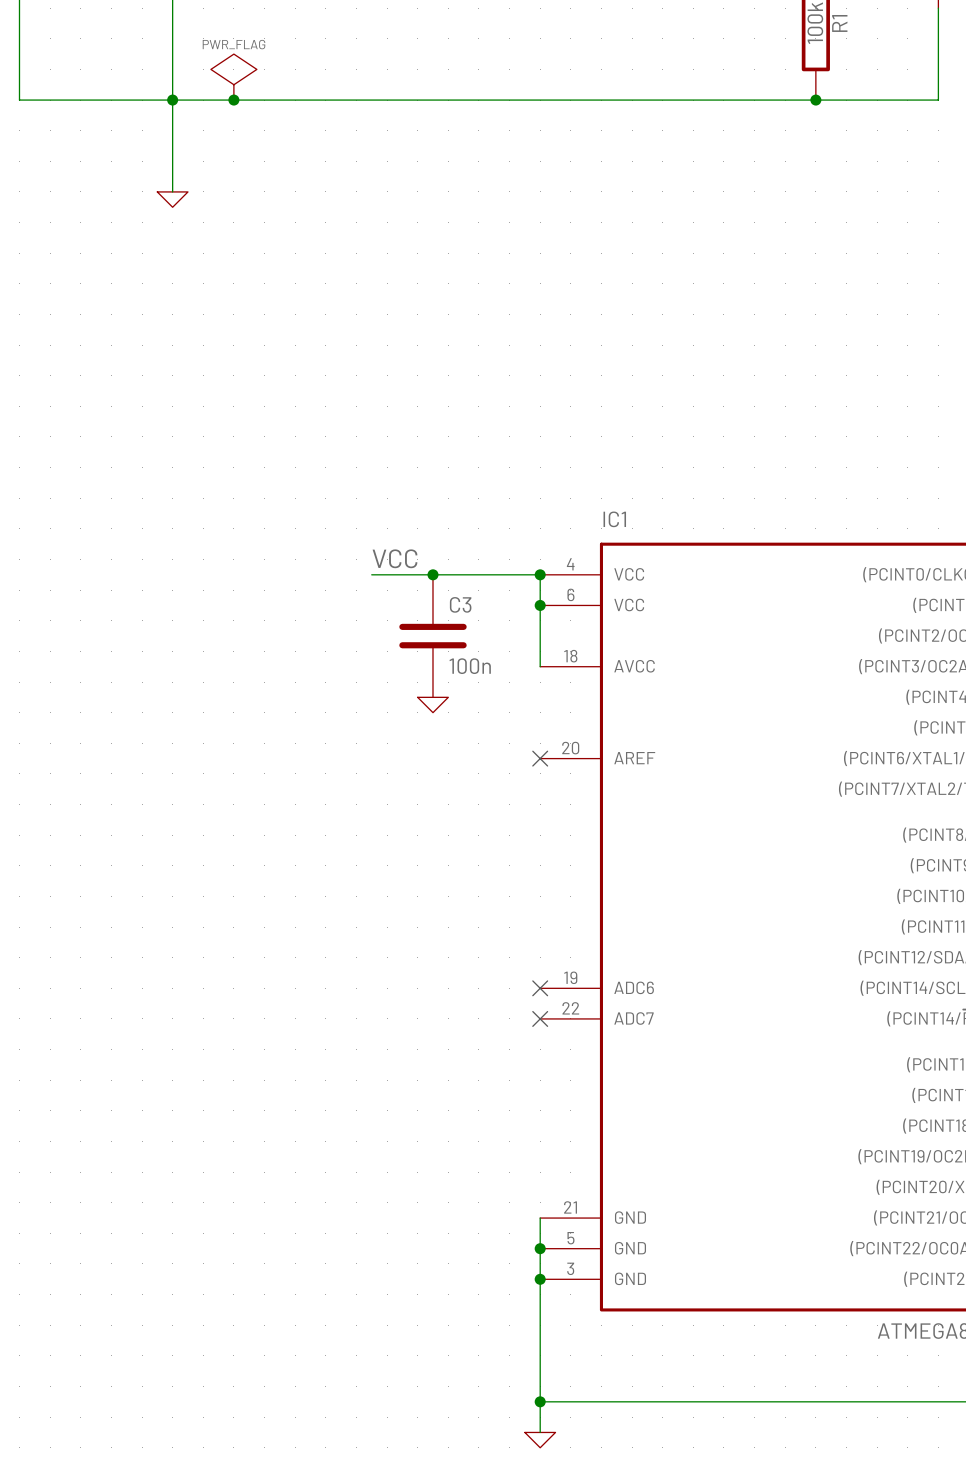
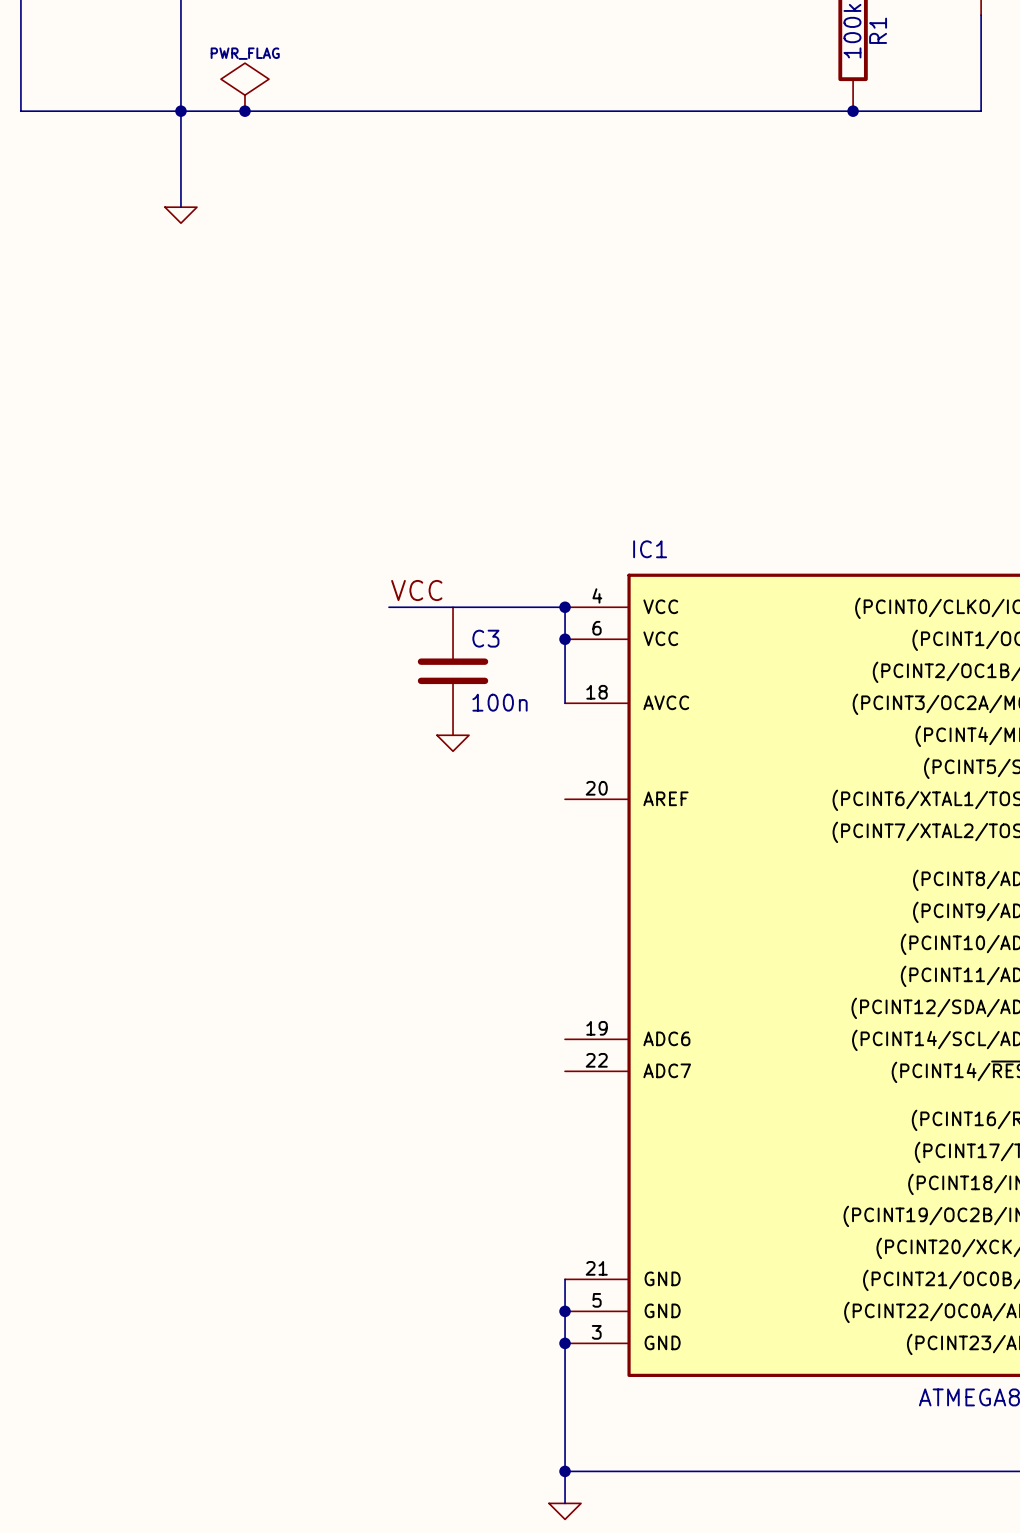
junction: (432, 574) -> none
no-connect mark: (540, 758) -> none
no-connect mark: (540, 988) -> none
no-connect mark: (540, 1018) -> none

